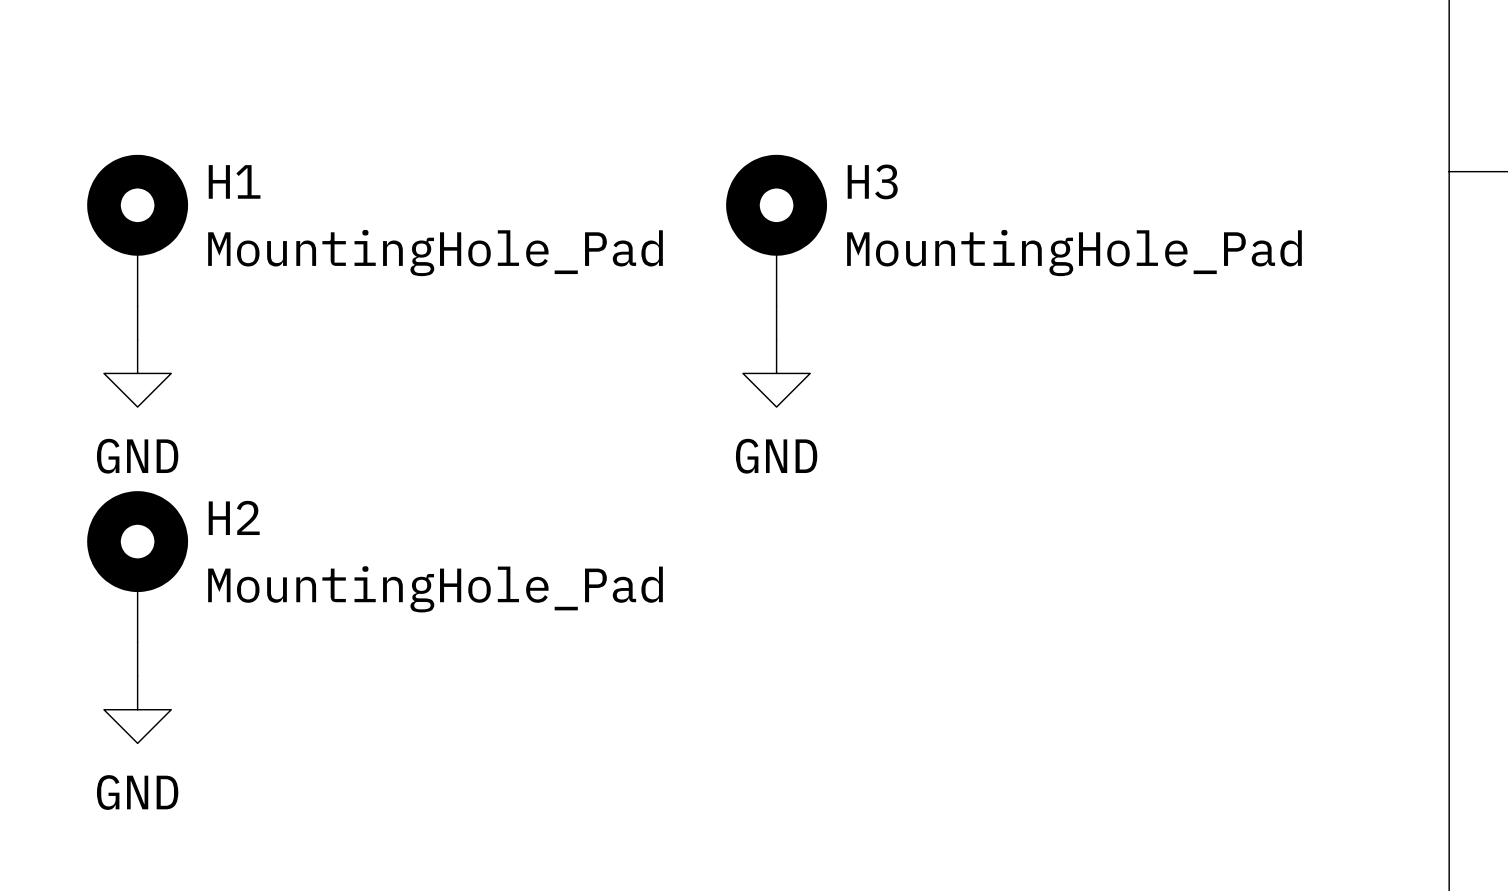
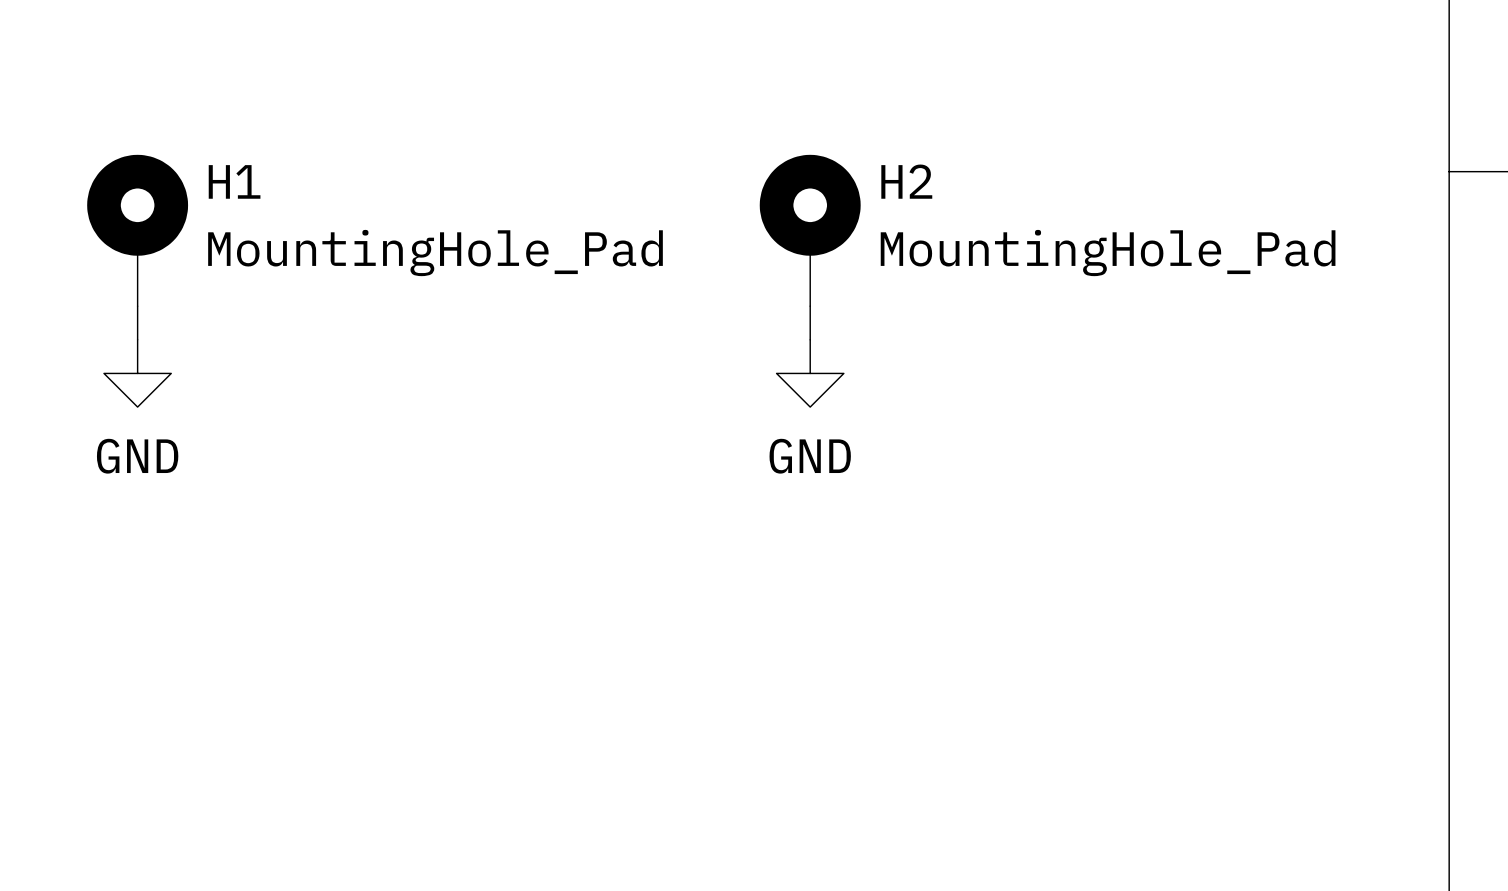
H3: MountingHole_Pad (776, 230) -> none
wire: (776, 306) (776, 339) -> (810, 306) (810, 339)
power symbol position: GND (776, 373) -> GND (810, 373)
H2 position: (137, 566) -> (810, 230)
wire: (137, 642) (137, 676) -> none
power symbol: GND (137, 709) -> none

